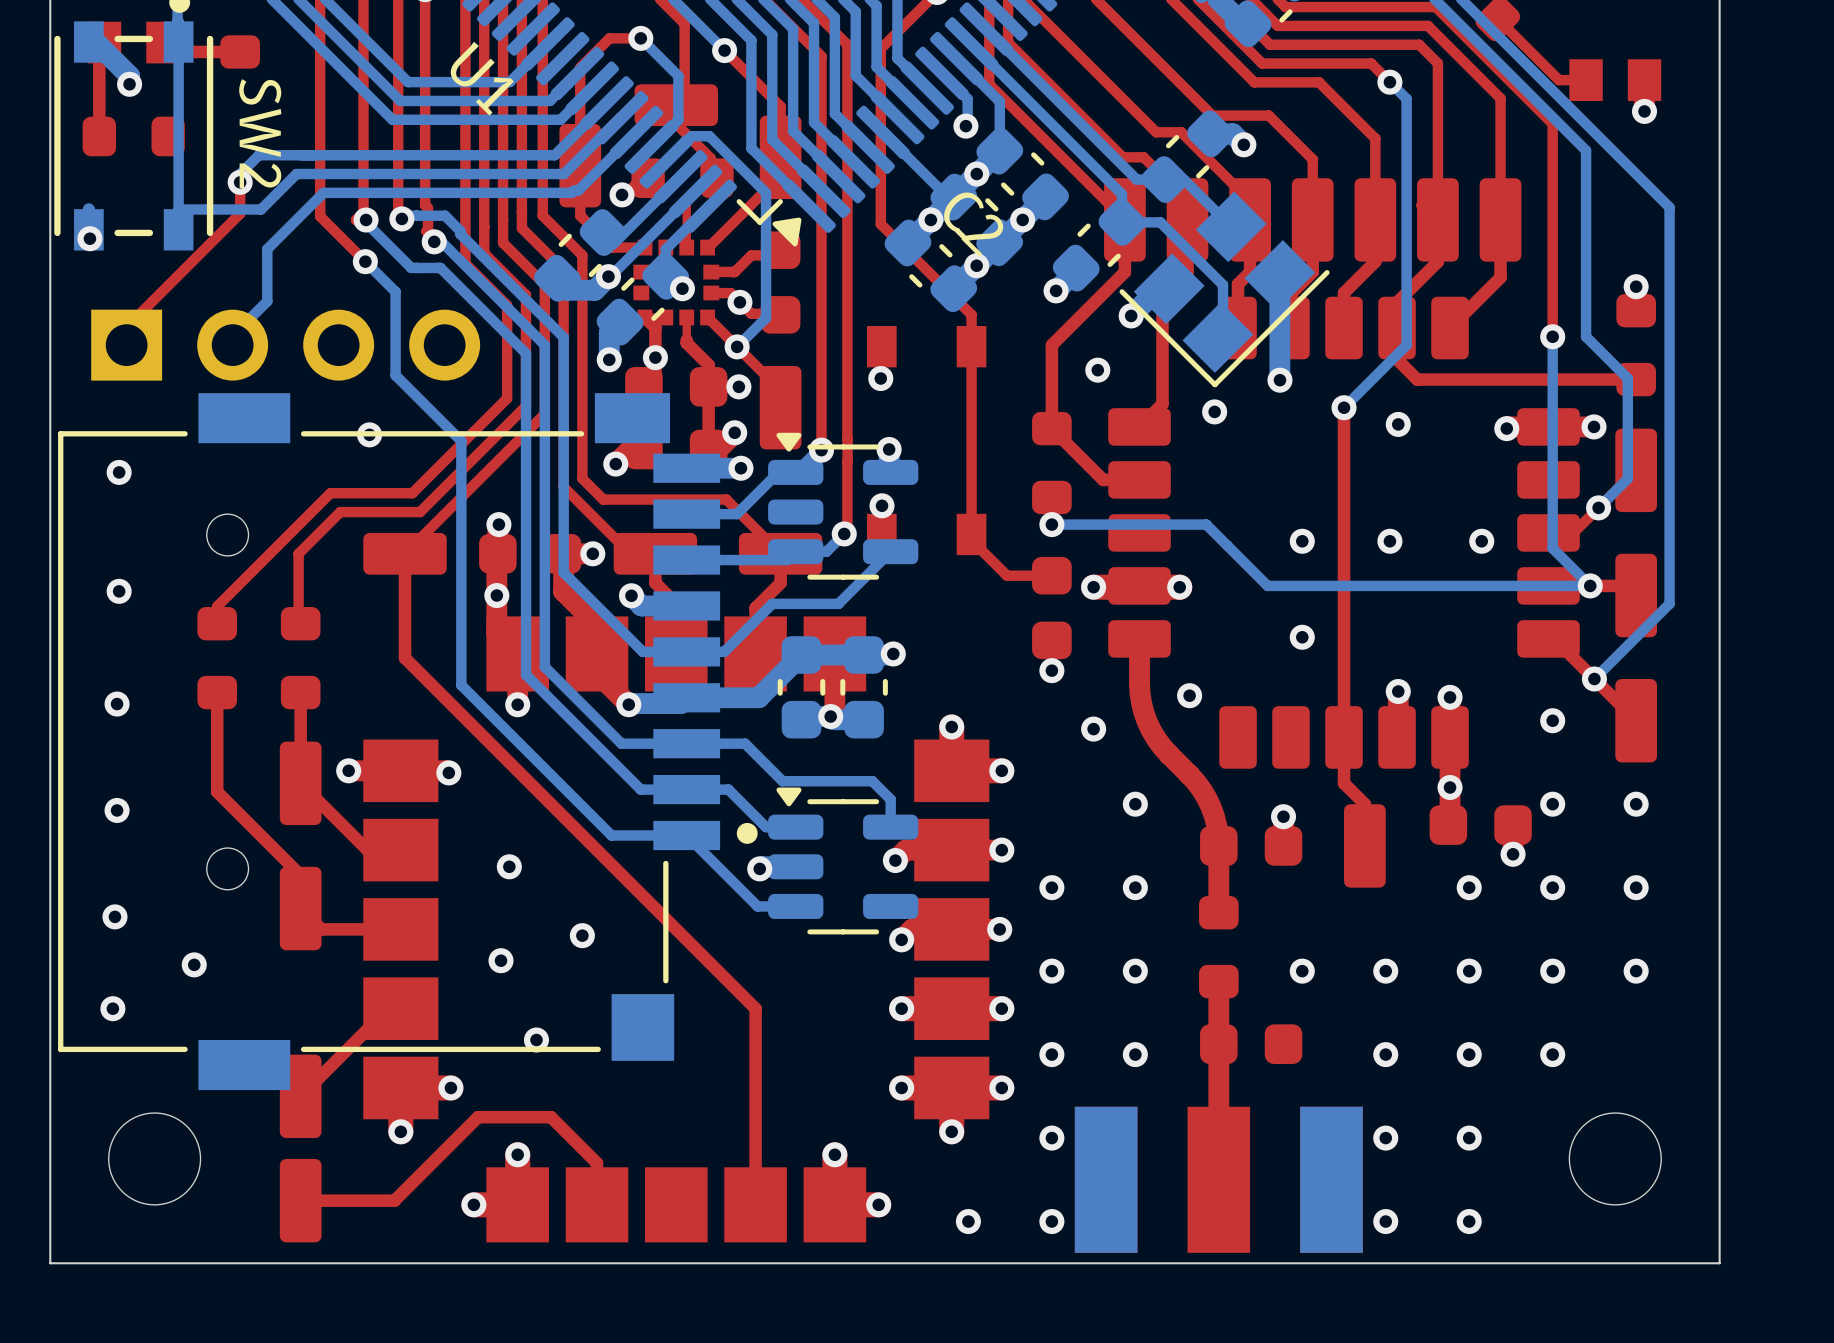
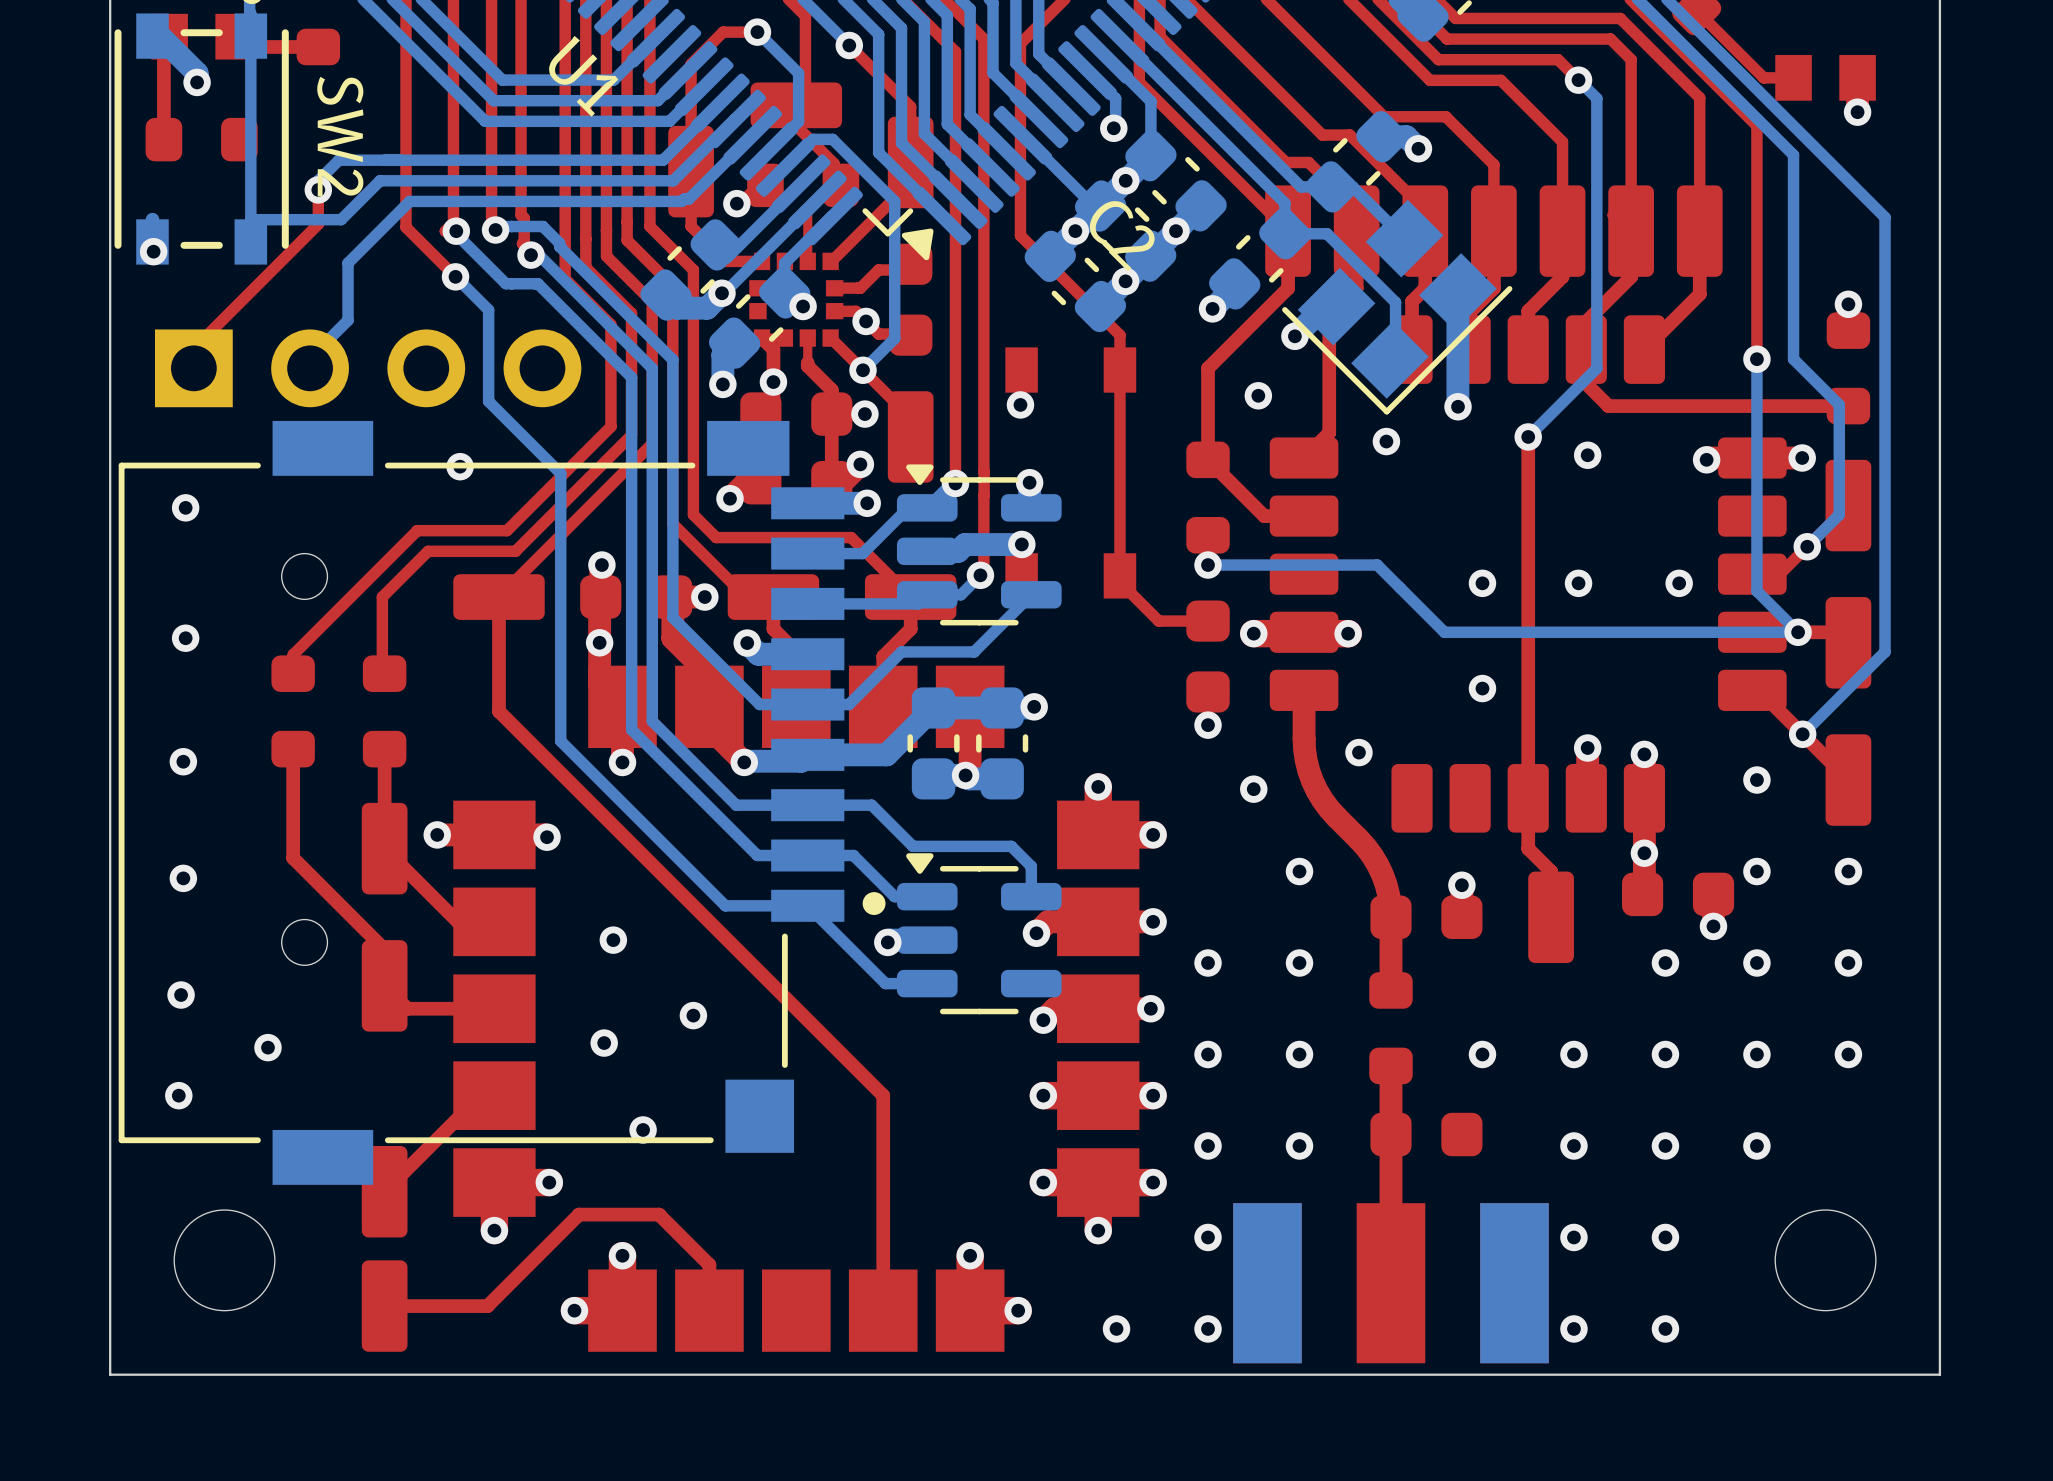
bottom track: none -> (1021, 544) (965, 544) (958, 551) (927, 551)

